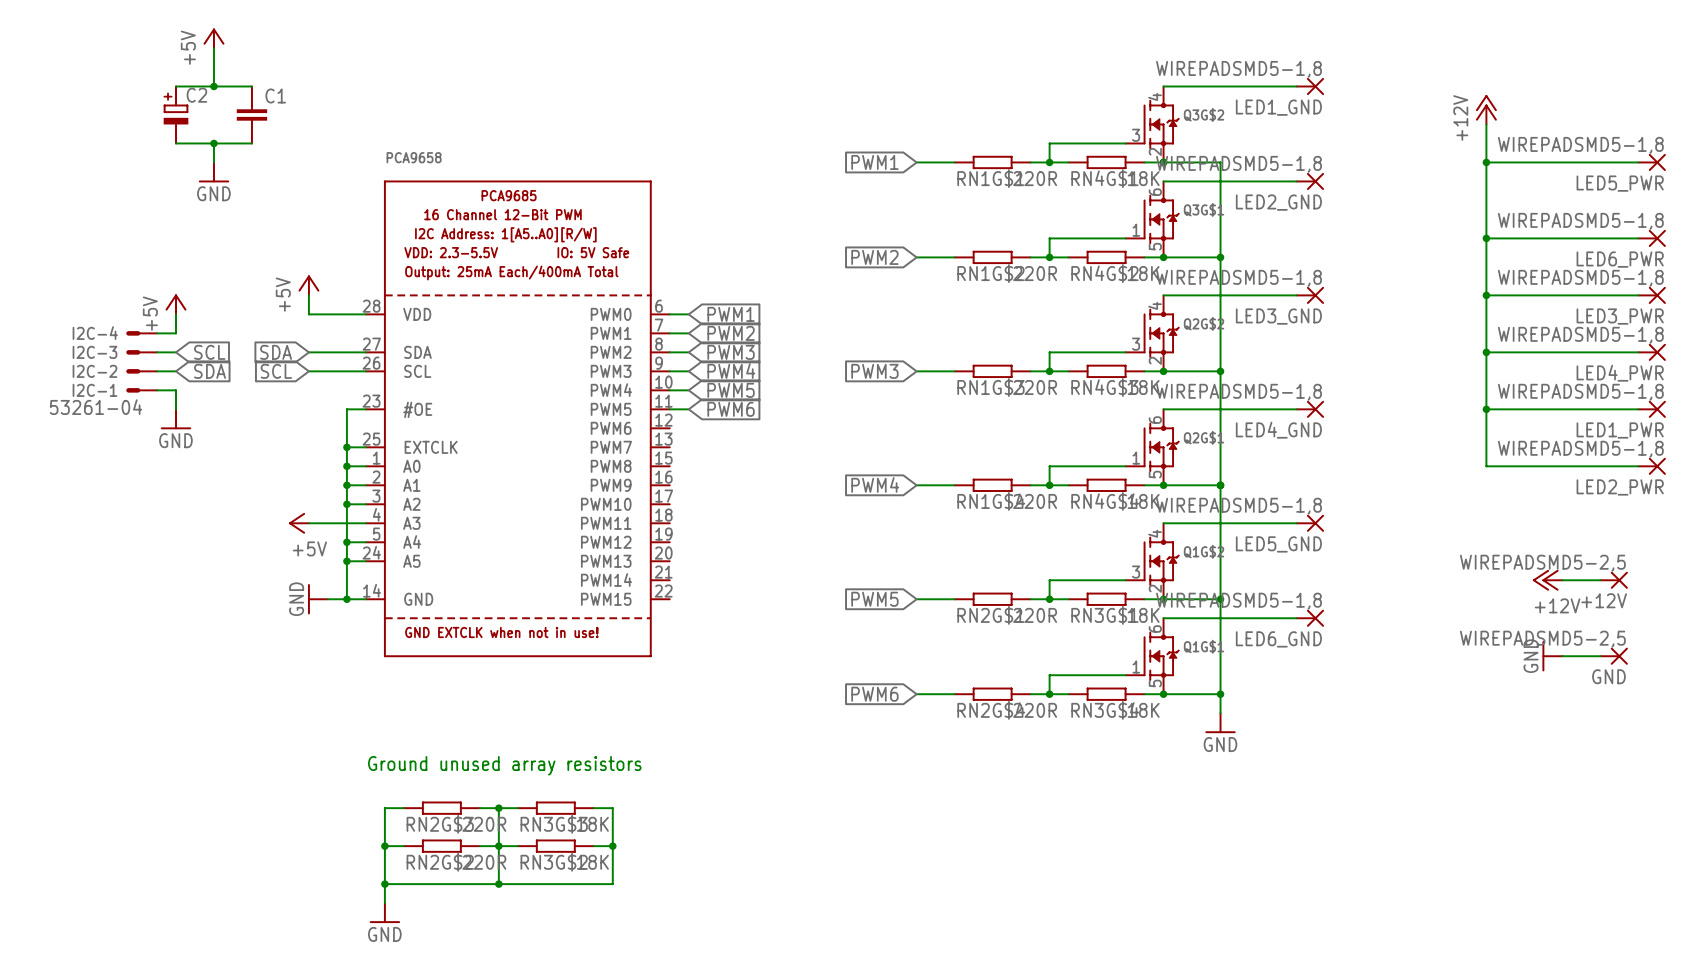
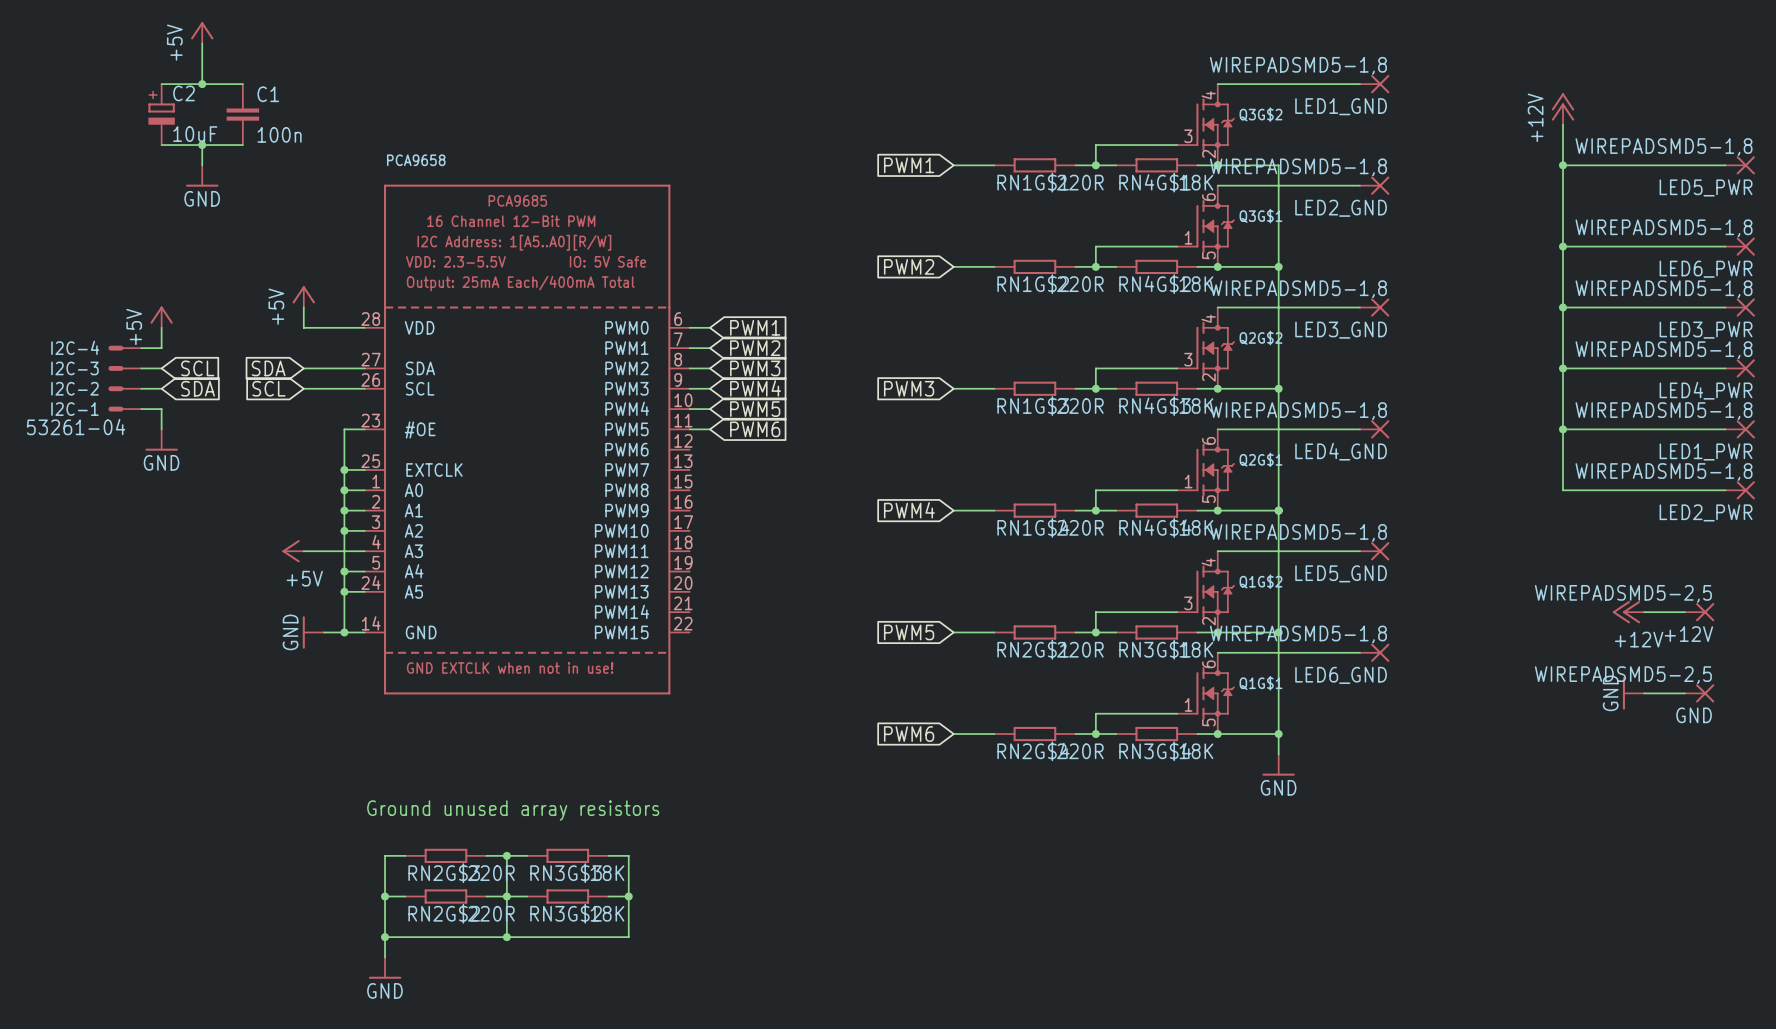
C2 value: none -> 10uF (195, 134)
C1 value: none -> 100n (279, 134)

